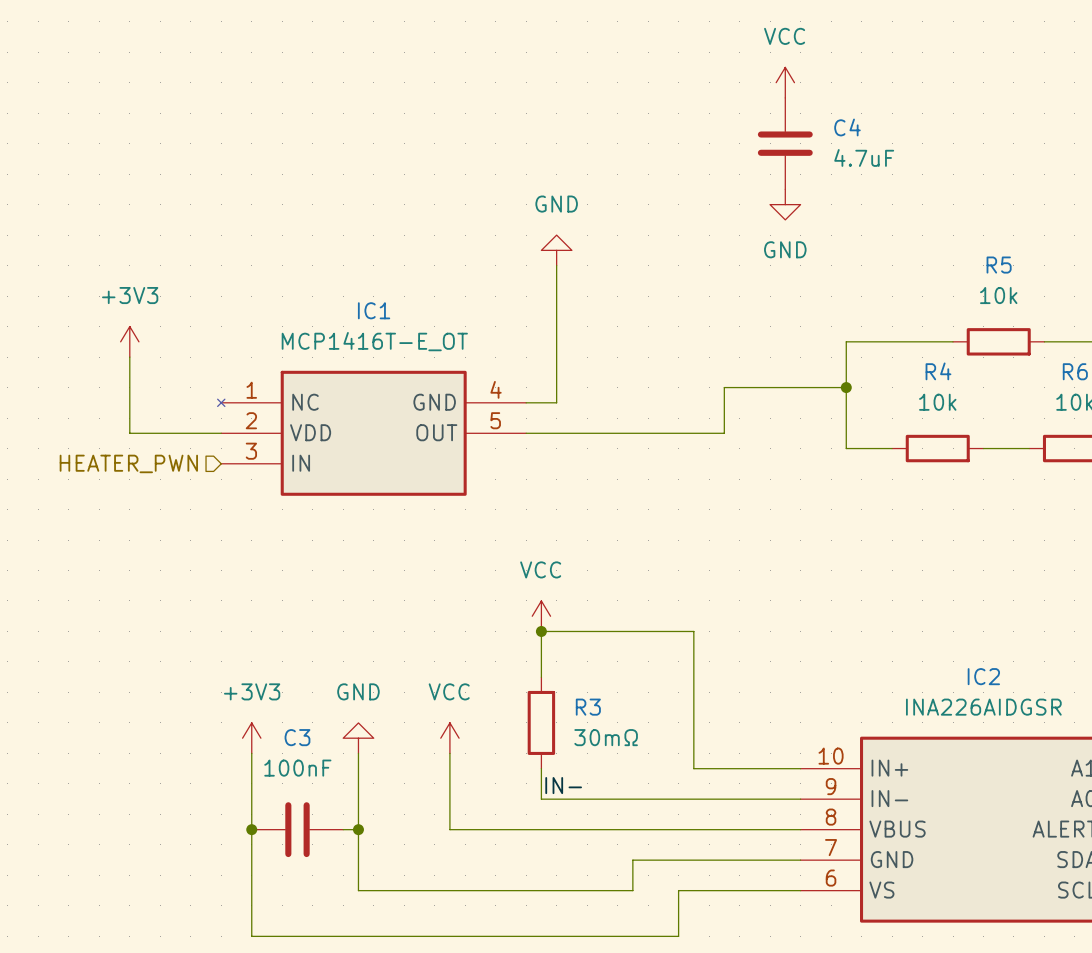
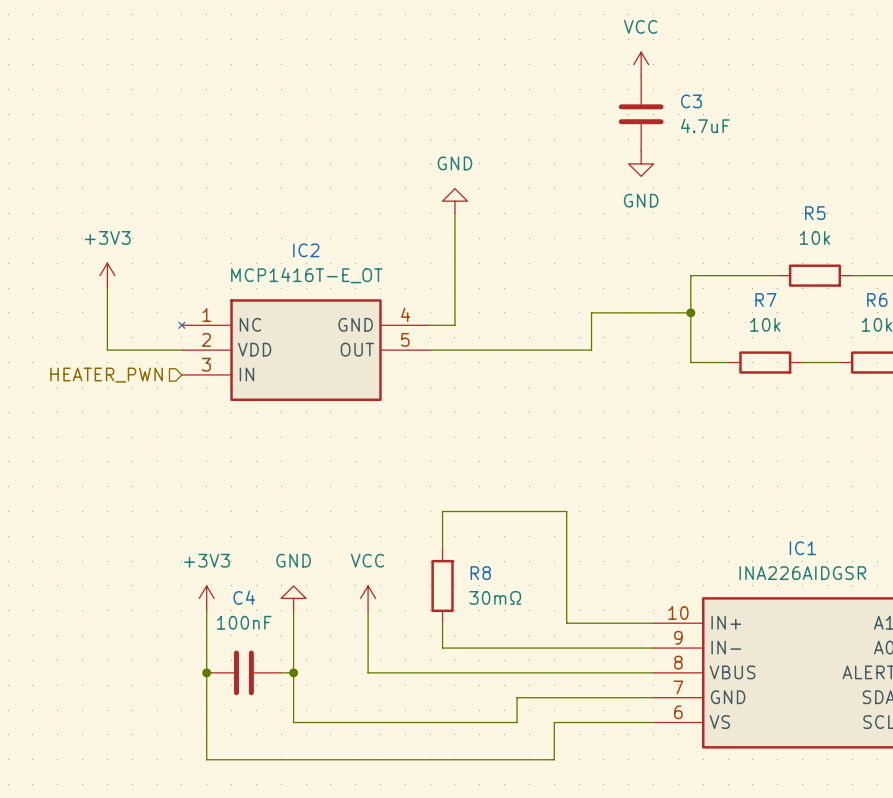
C4 name: C4 (847, 127) -> C3 (691, 101)
IC1 name: IC1 (374, 310) -> IC2 (306, 250)
R4 name: R4 (938, 371) -> R7 (765, 300)
power symbol: VCC (541, 616) -> none
junction: (541, 631) -> none
IC2 name: IC2 (983, 676) -> IC1 (802, 548)
R3 name: R3 (588, 707) -> R8 (480, 573)
C3 name: C3 (297, 737) -> C4 (244, 597)
label: IN- (563, 785) -> none

